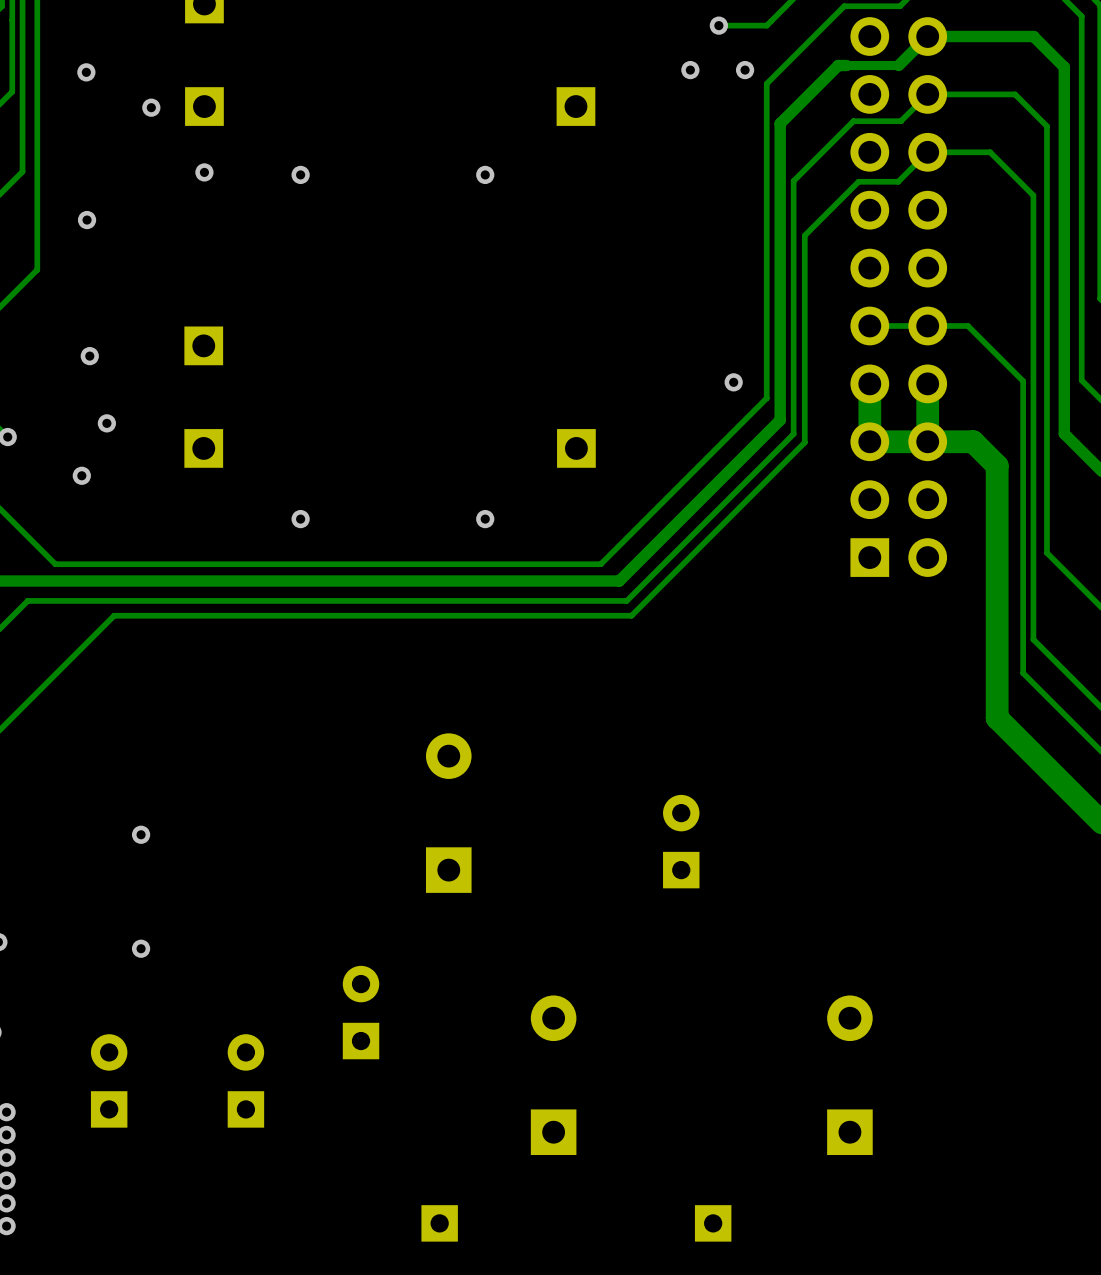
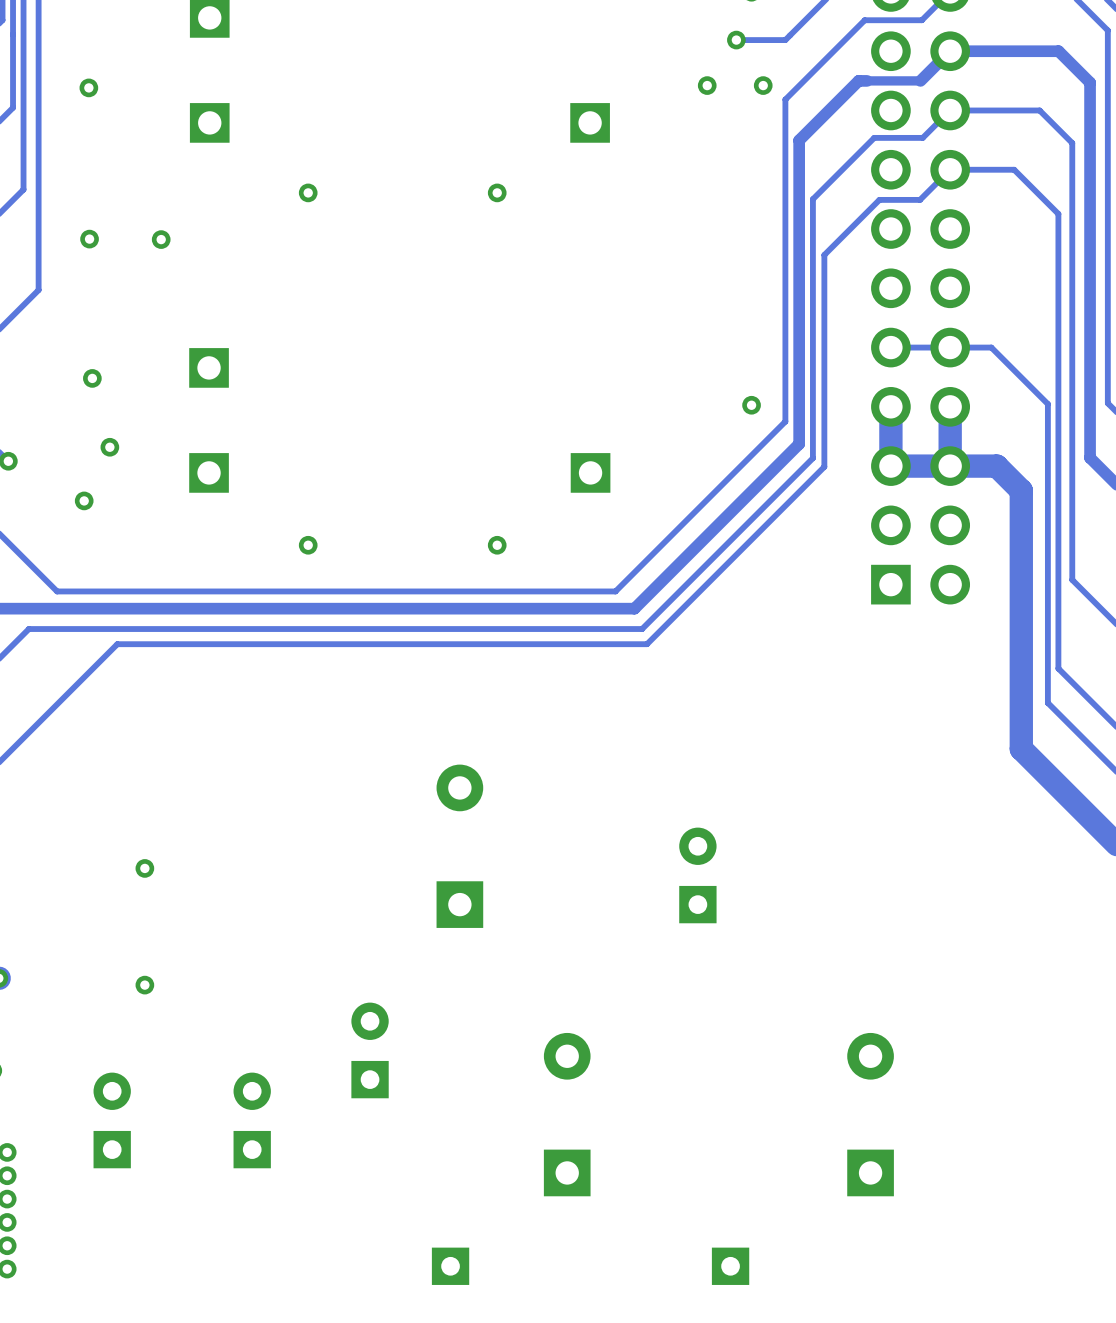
via: (151, 107) -> none
via: (204, 172) -> none
via: none -> (161, 239)

